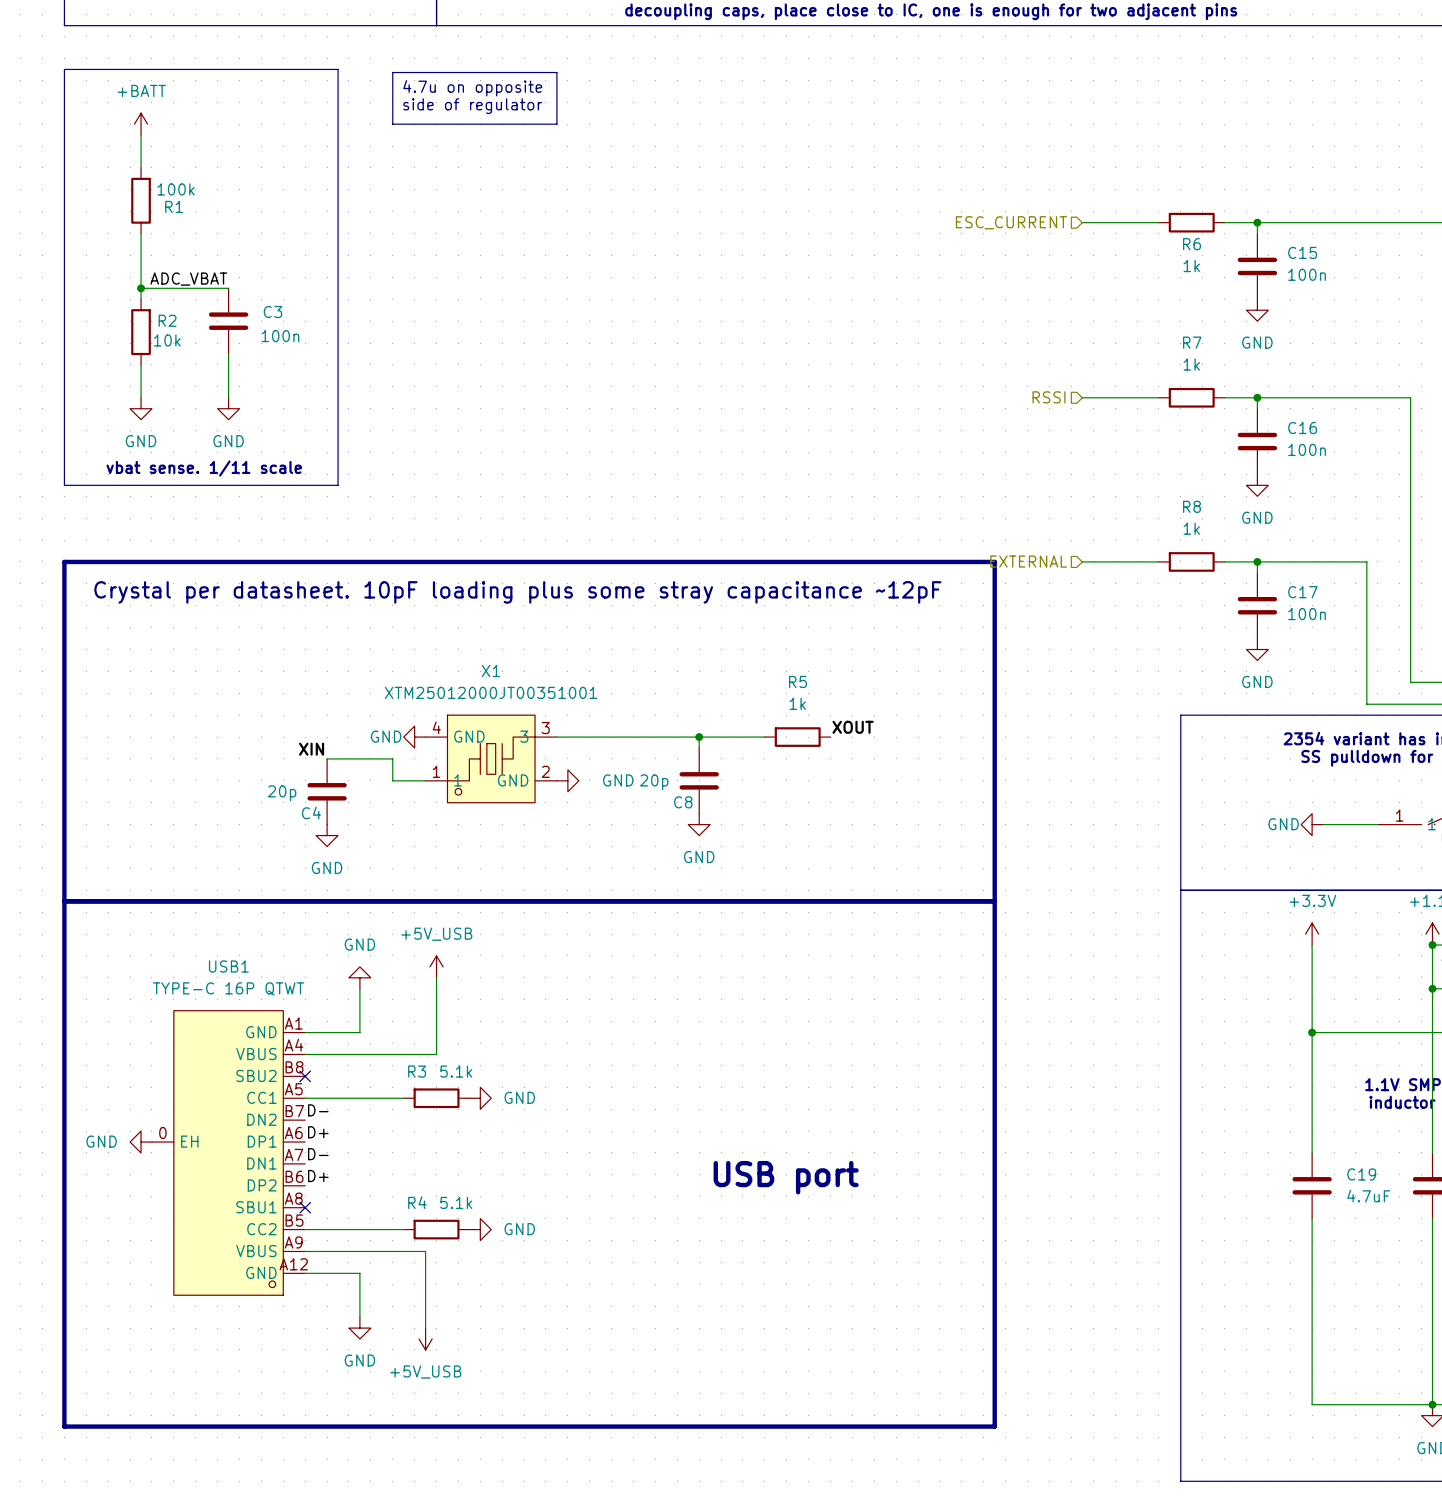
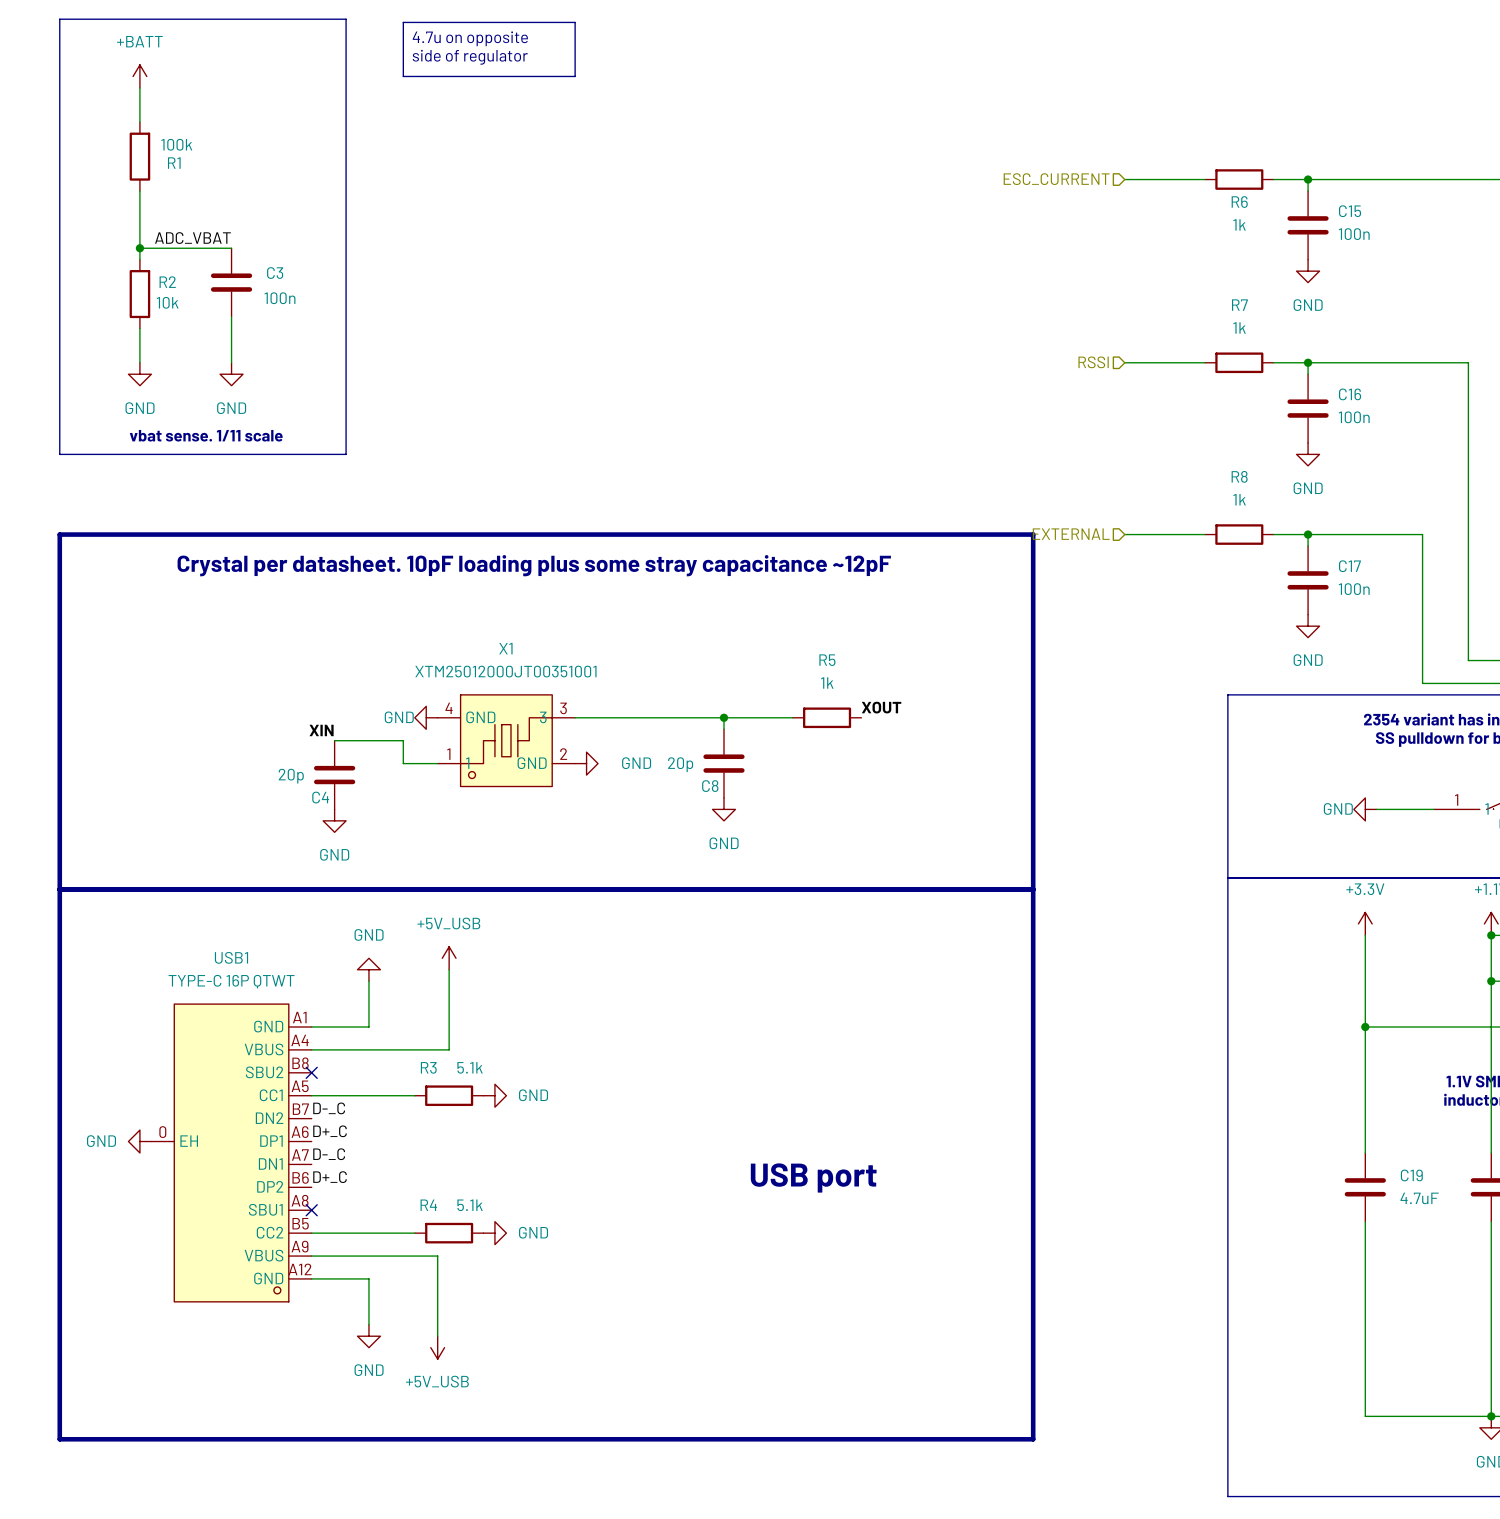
label: D- (318, 1110) -> D-_C (329, 1108)
label: D+ (318, 1132) -> D+_C (330, 1131)
label: D- (318, 1154) -> D-_C (329, 1154)
label: D+ (318, 1176) -> D+_C (330, 1177)

